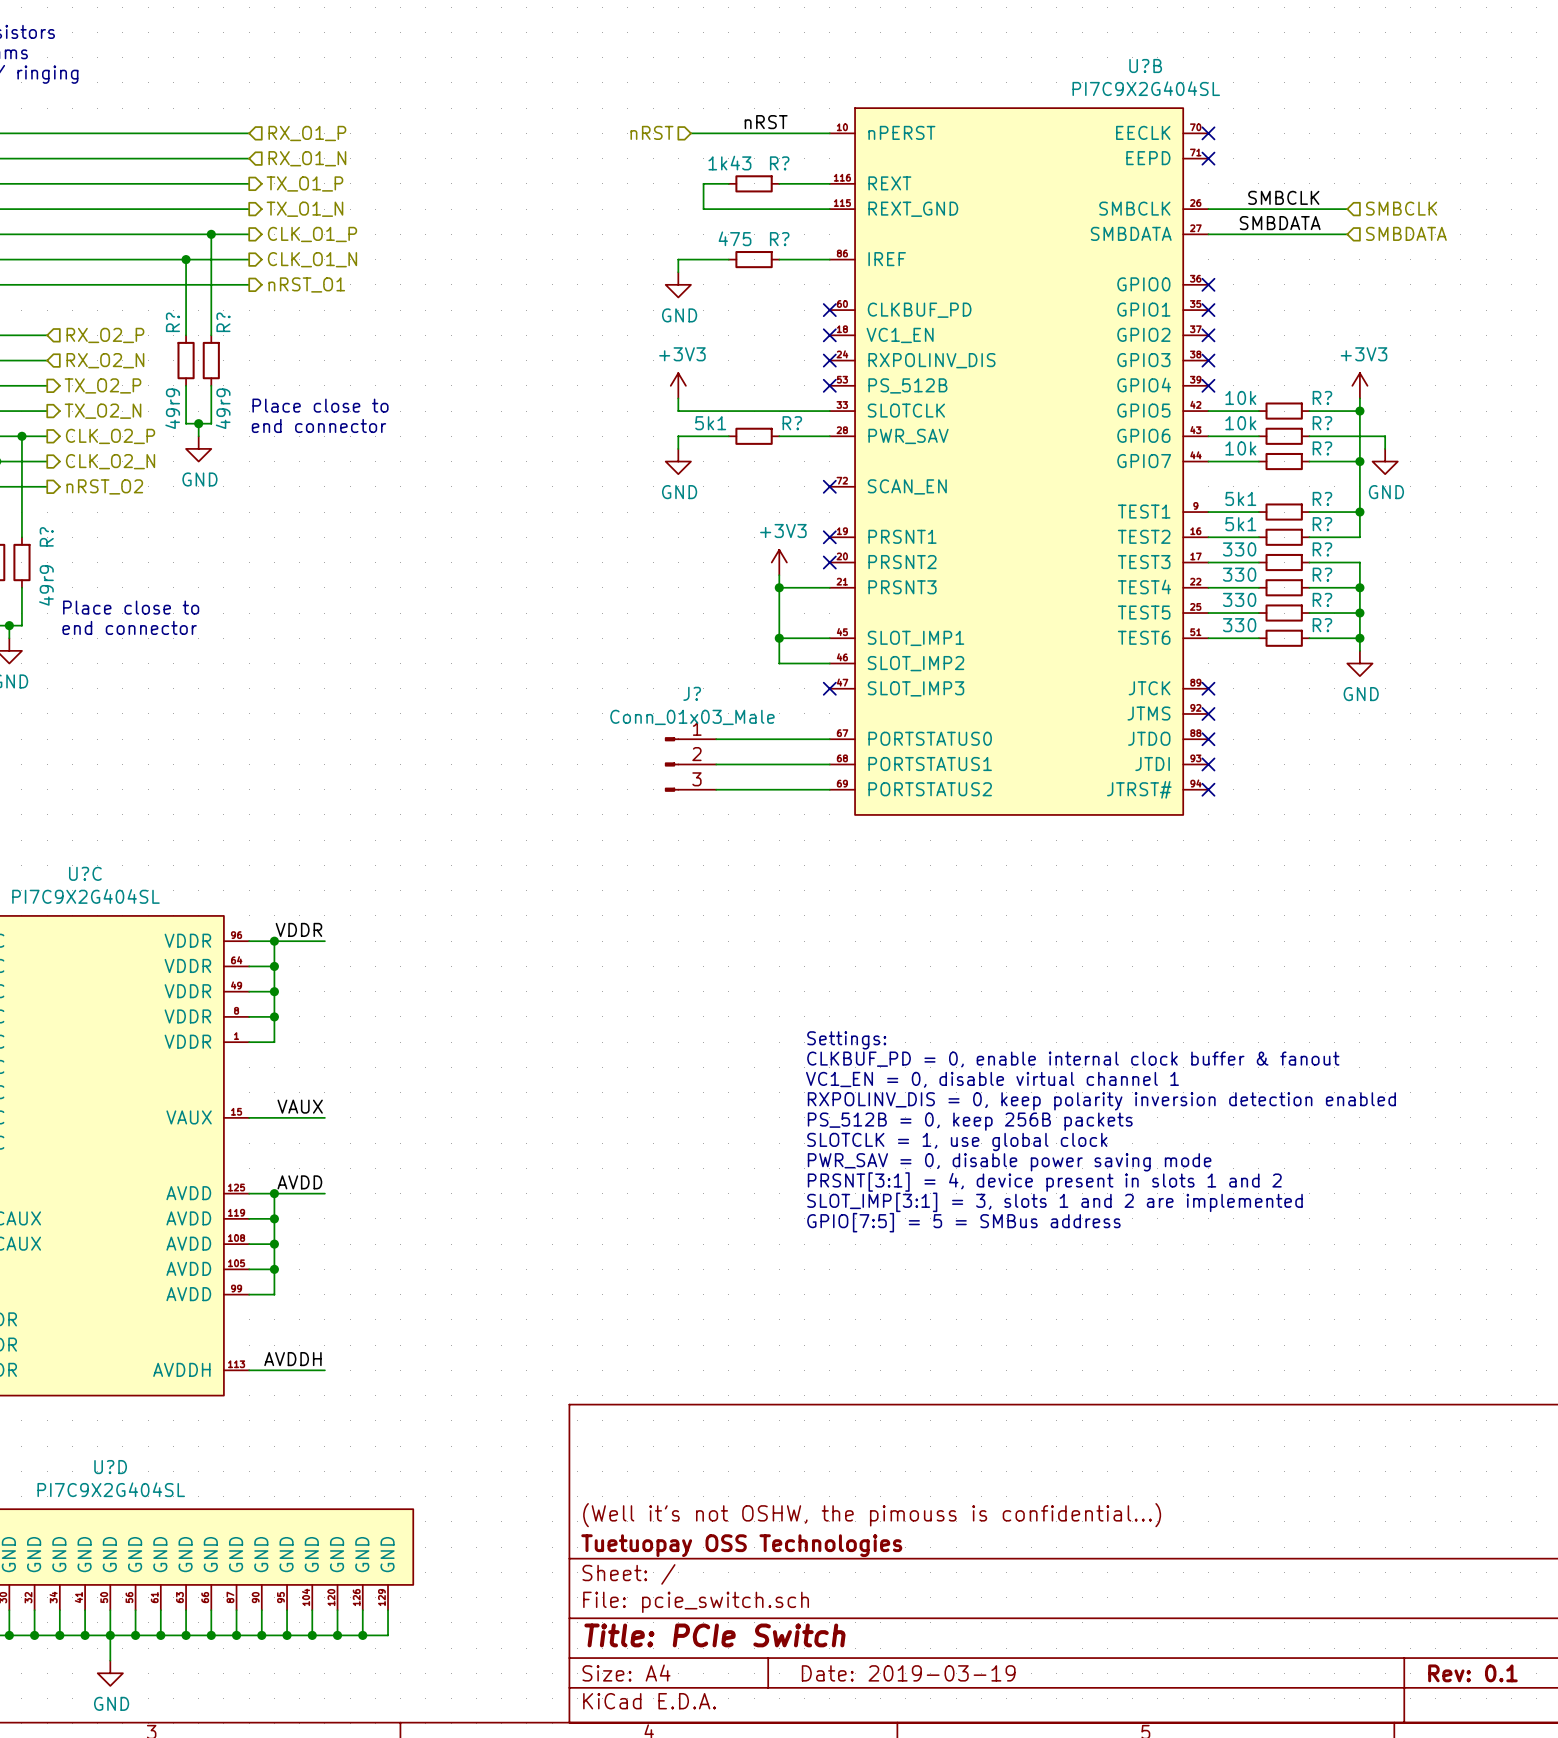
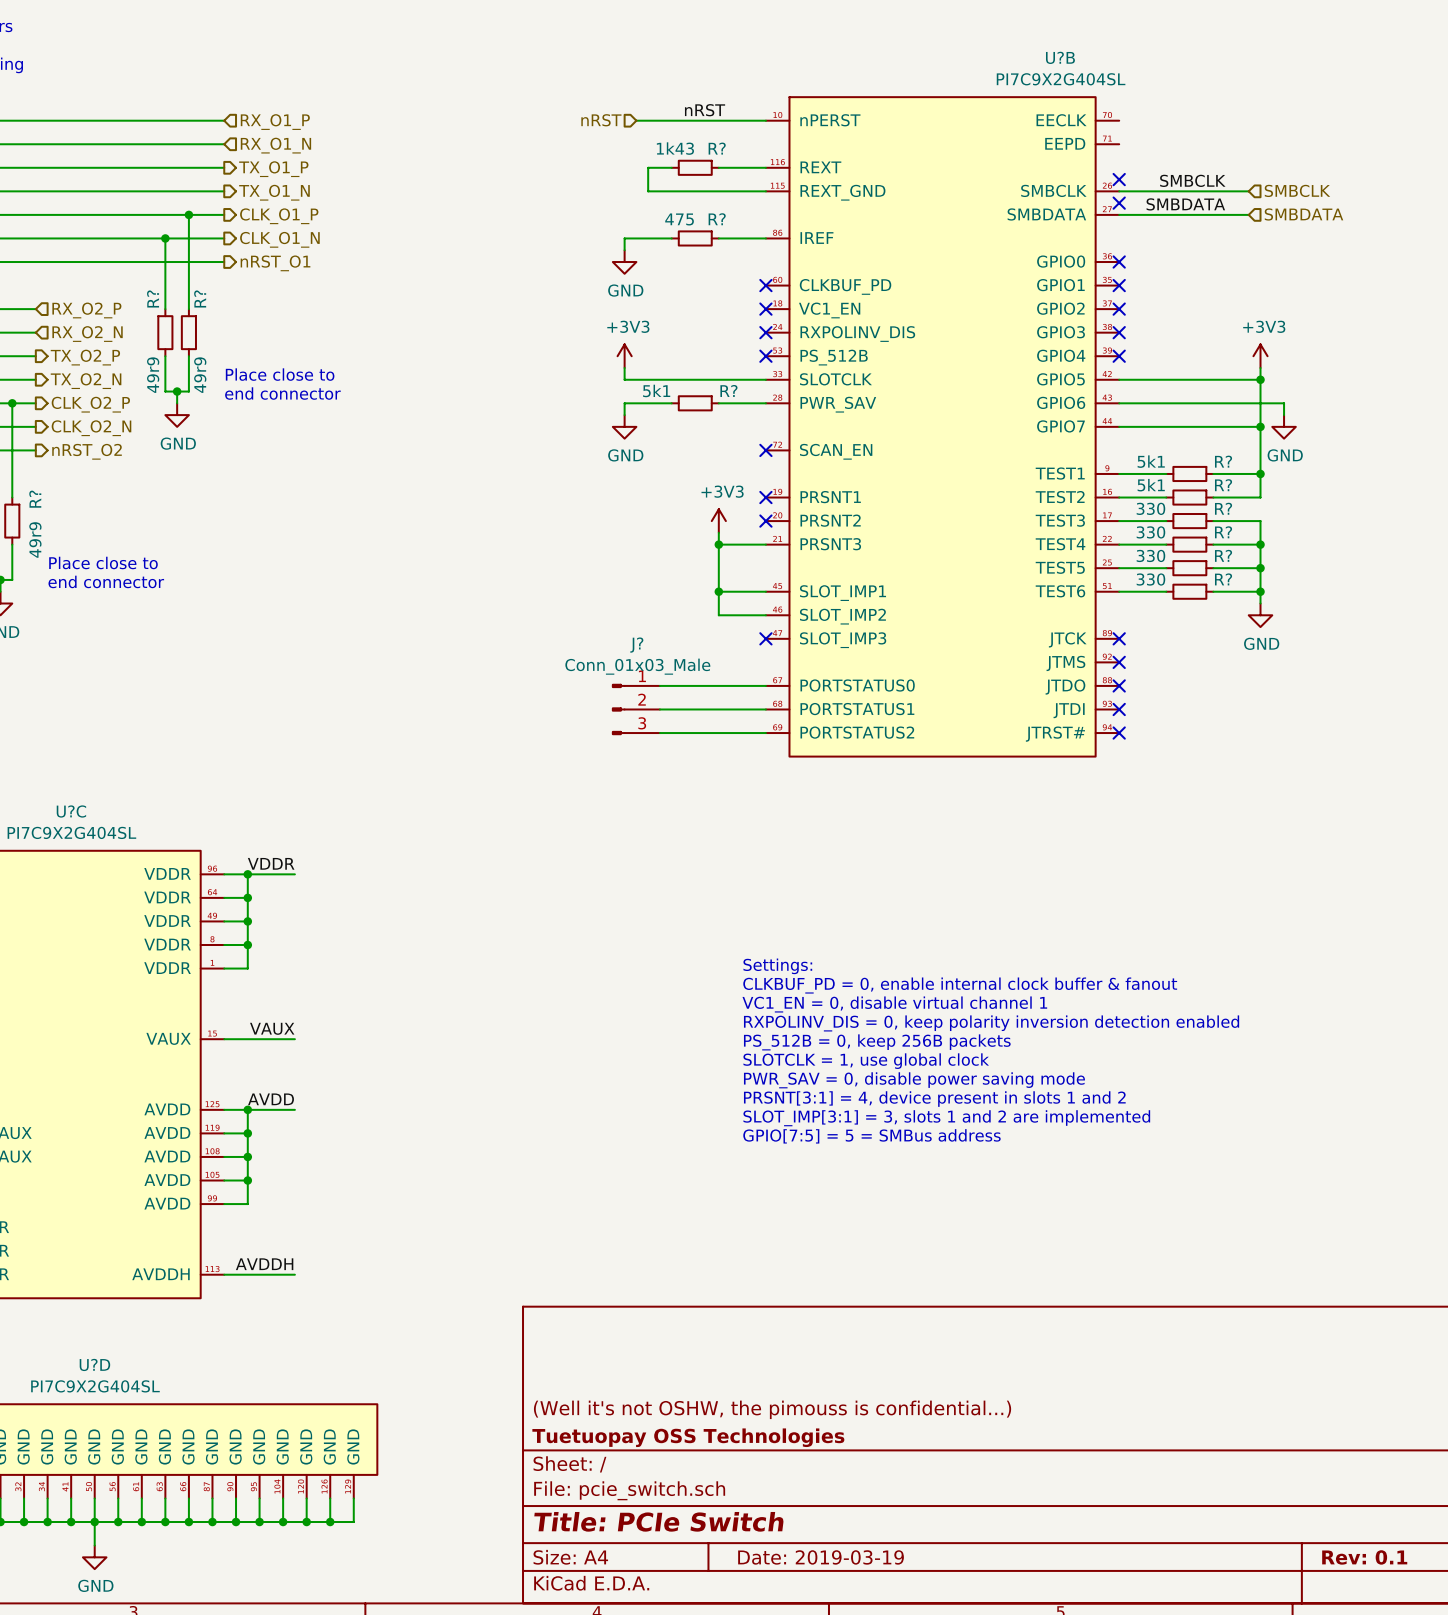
no-connect mark: (1208, 133) -> none
no-connect mark: (1208, 158) -> none
no-connect mark: none -> (1119, 179)
no-connect mark: none -> (1119, 203)
wire: none -> (1166, 379) (1213, 379)
R?: 10k (1284, 411) -> none
wire: none -> (1166, 403) (1213, 403)
R?: 10k (1284, 436) -> none
wire: none -> (1166, 426) (1213, 426)
R?: 10k (1284, 461) -> none

